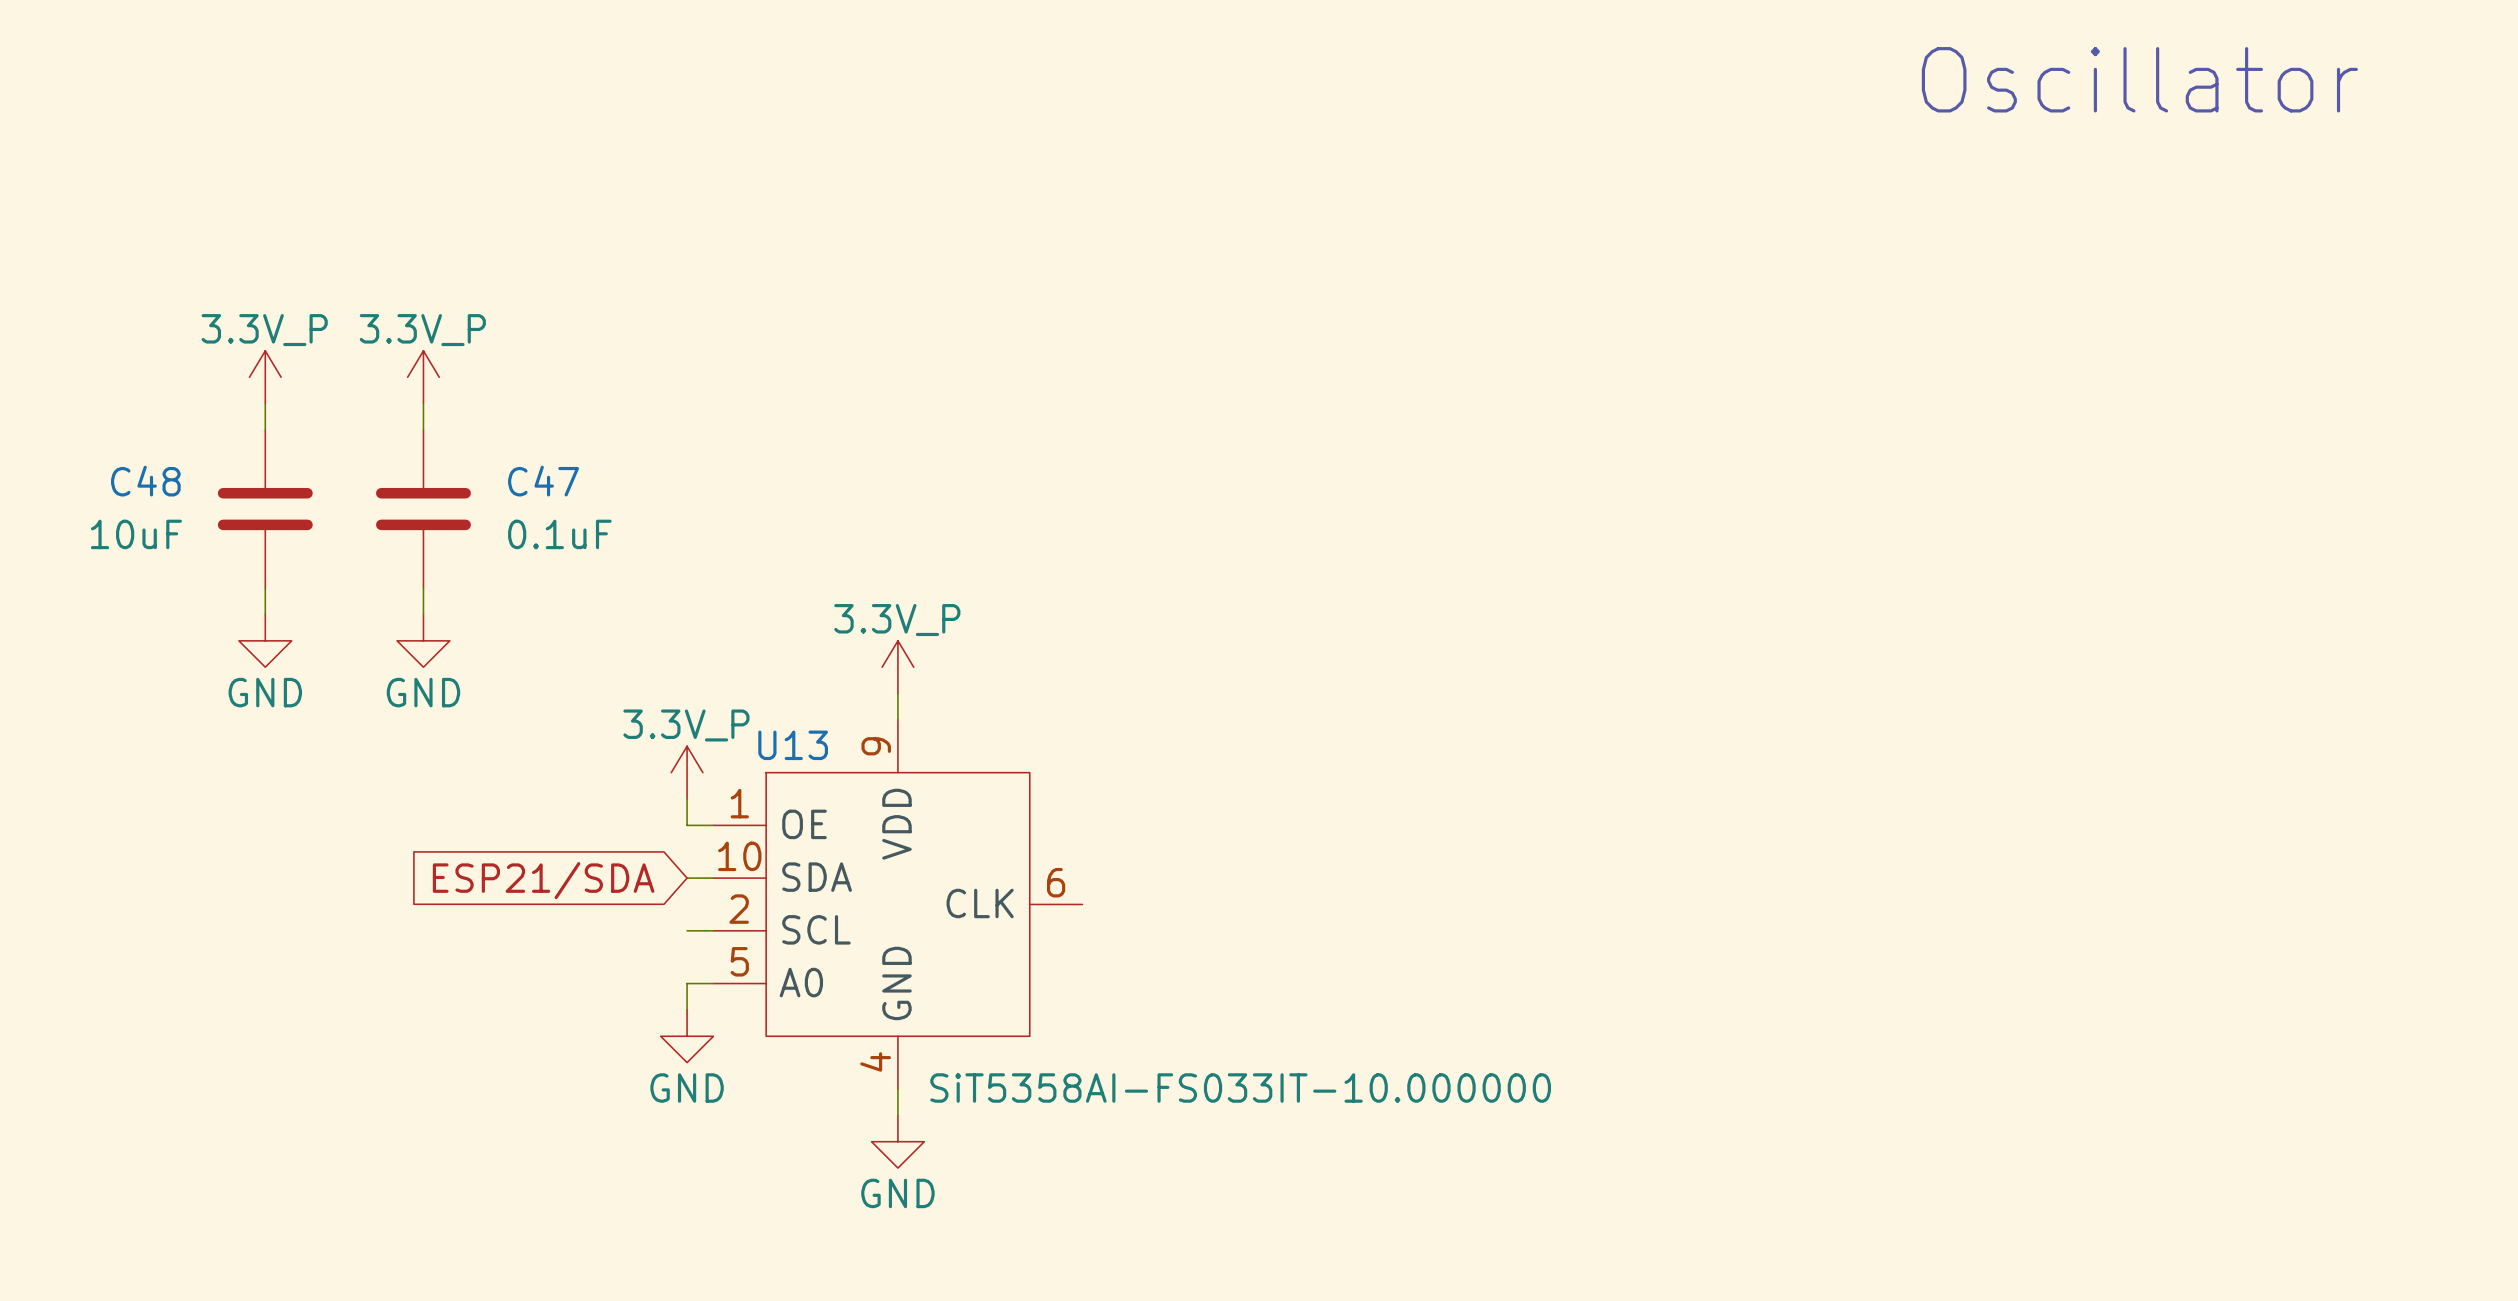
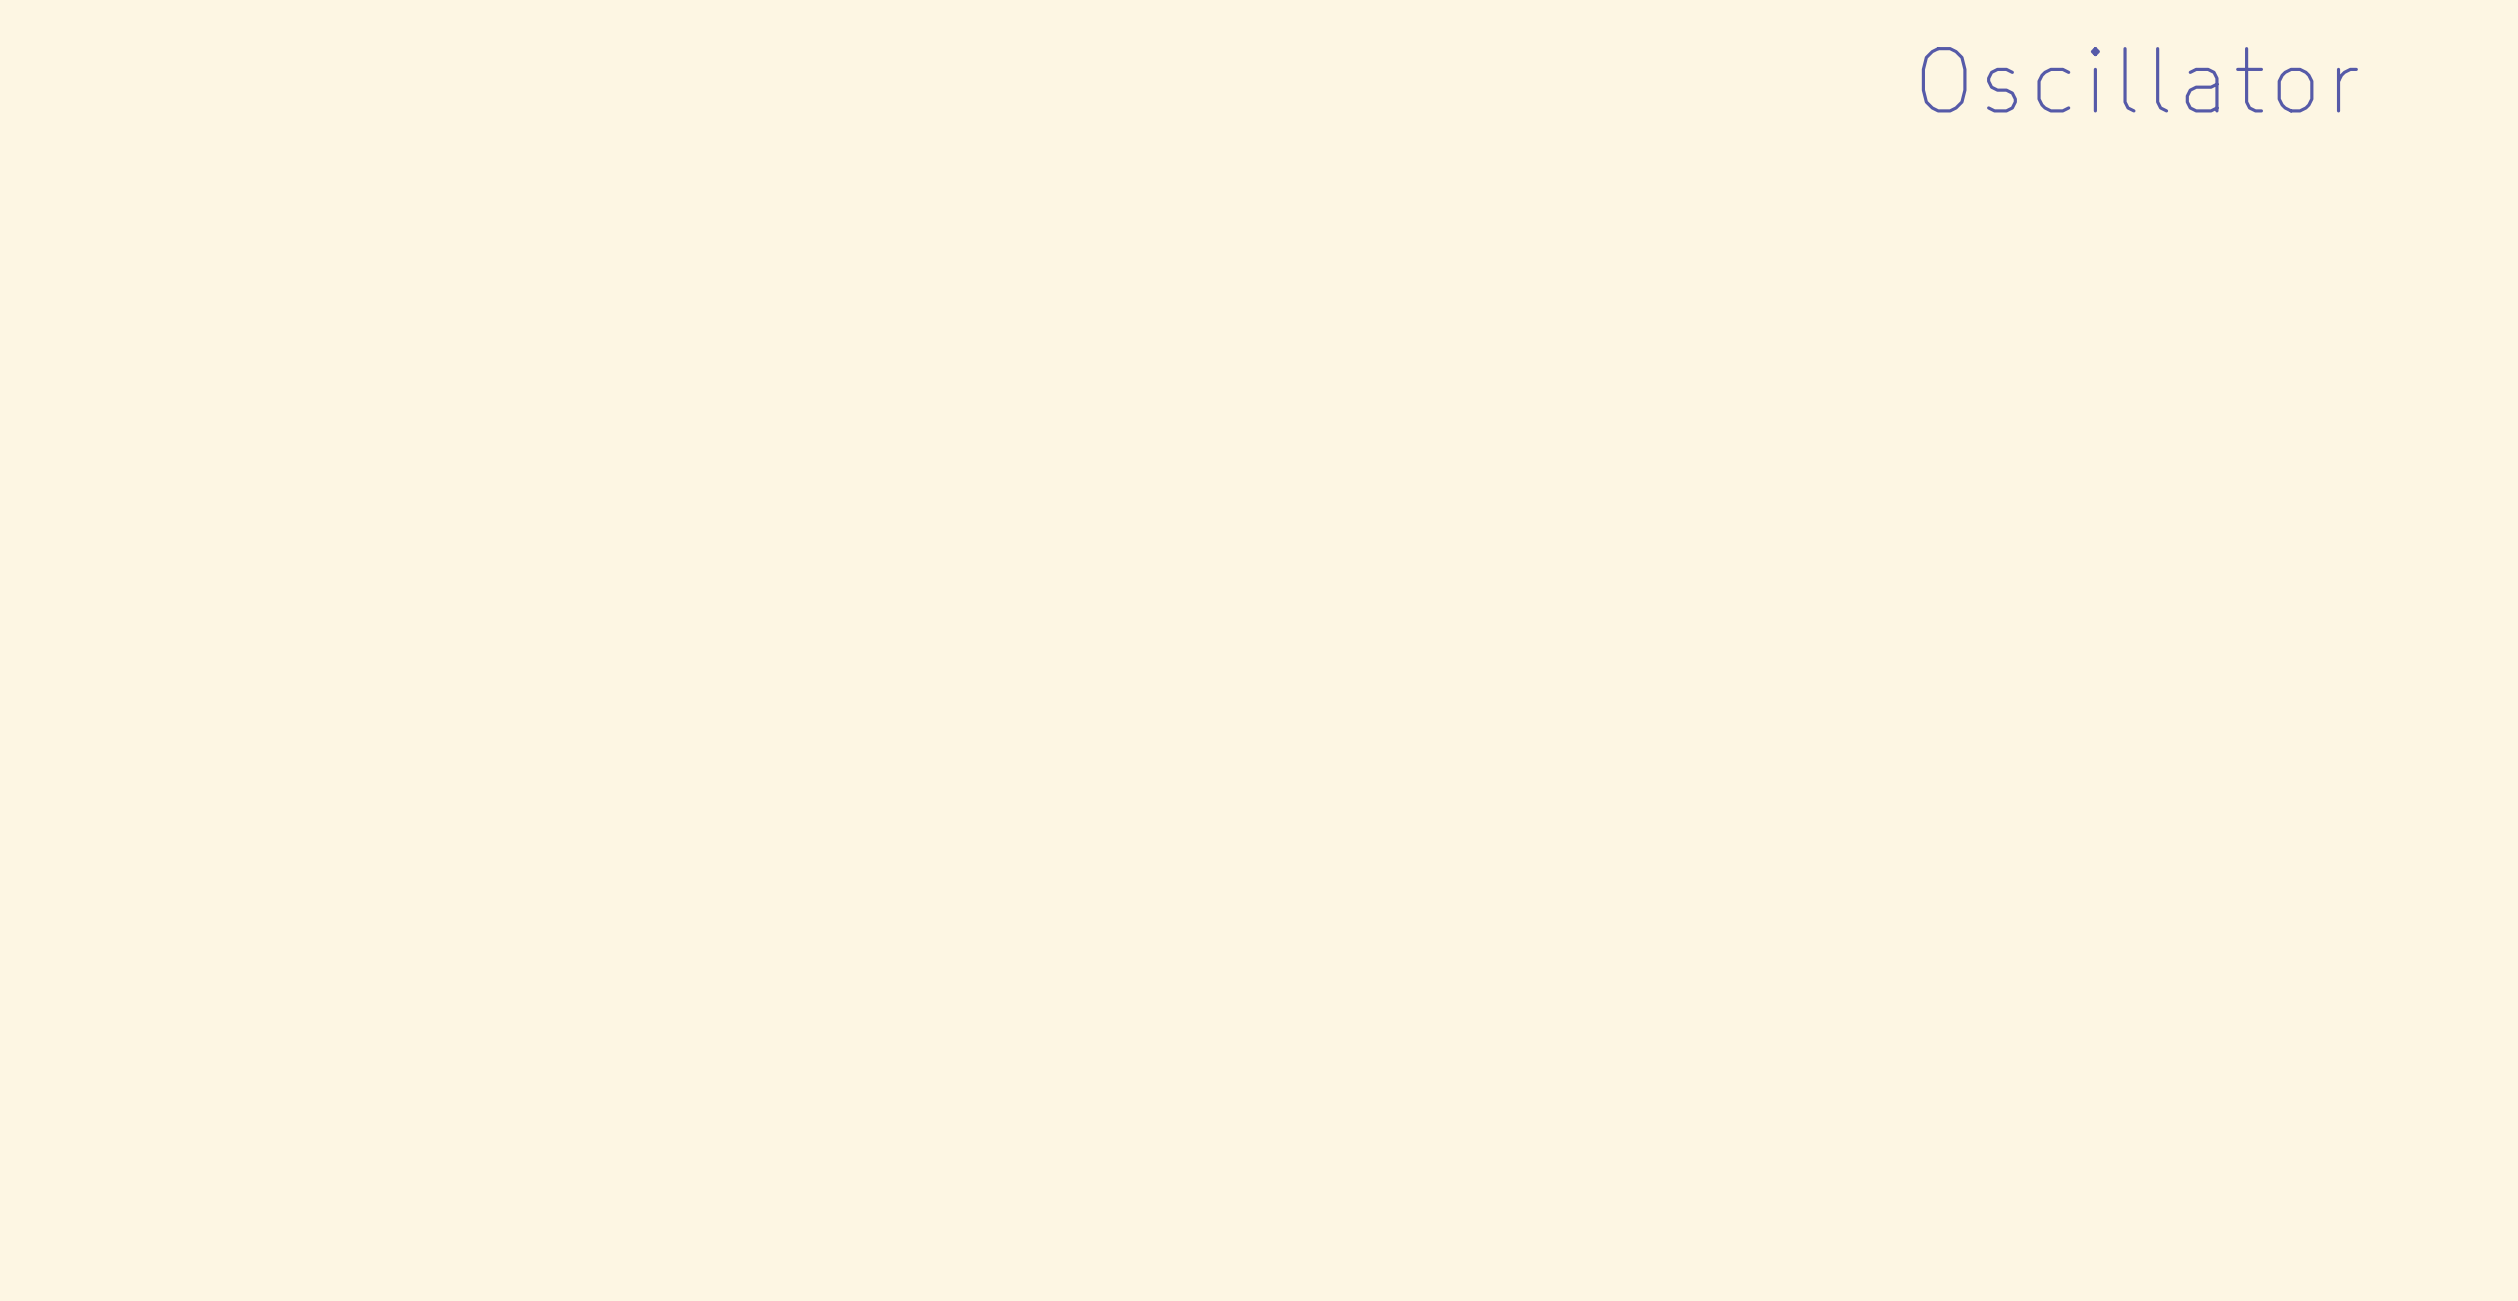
power symbol: 3.3V_P (265, 377) -> none
power symbol: 3.3V_P (423, 377) -> none
wire: (265, 403) (265, 429) -> none
wire: (423, 403) (423, 429) -> none
C48: 10uF (265, 509) -> none
C47: 0.1uF (423, 509) -> none
wire: (265, 588) (265, 614) -> none
wire: (423, 588) (423, 614) -> none
power symbol: GND (265, 640) -> none
power symbol: GND (423, 640) -> none
power symbol: 3.3V_P (897, 667) -> none
wire: (897, 693) (897, 719) -> none
power symbol: 3.3V_P (687, 772) -> none
wire: (687, 799) (687, 825) (713, 825) -> none
wire: (687, 878) (713, 878) -> none
global label: ESP21/SDA (543, 880) -> none
U13: SiT5358AI-FS033IT-10.000000 (897, 904) -> none
wire: (687, 930) (713, 930) -> none
wire: (713, 983) (687, 983) (687, 1009) -> none
power symbol: GND (687, 1036) -> none
wire: (897, 1088) (897, 1115) -> none
power symbol: GND (897, 1141) -> none

